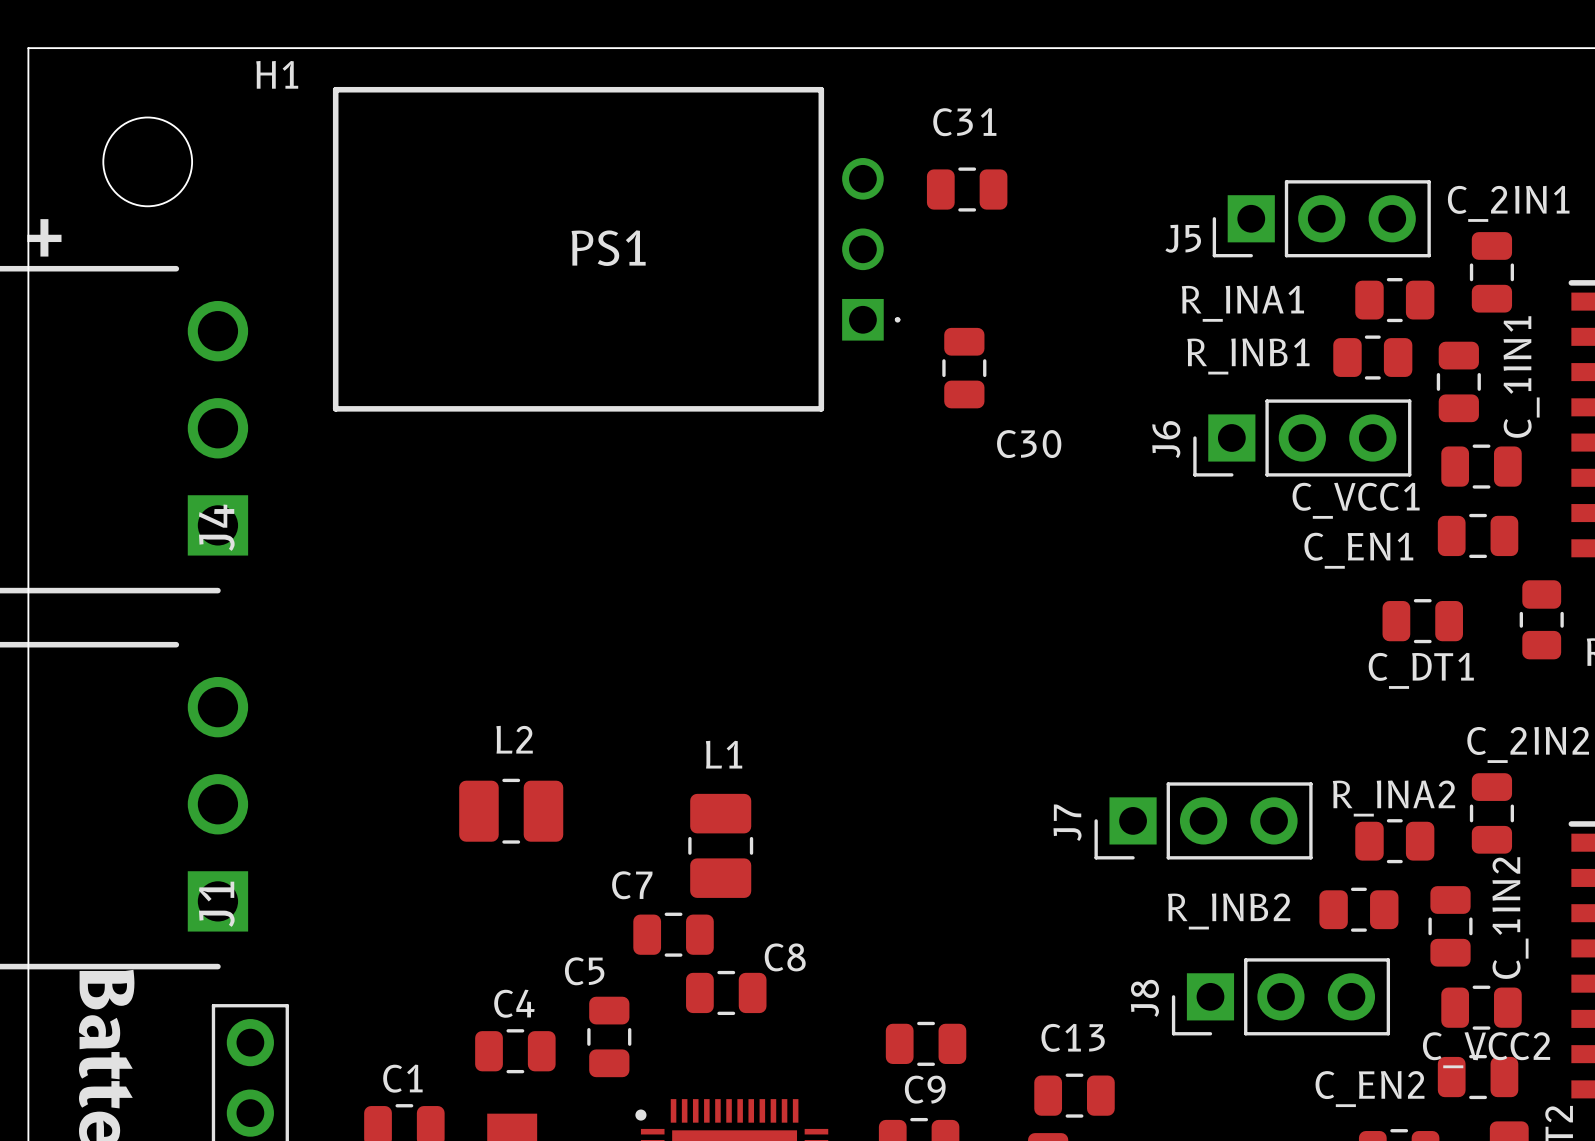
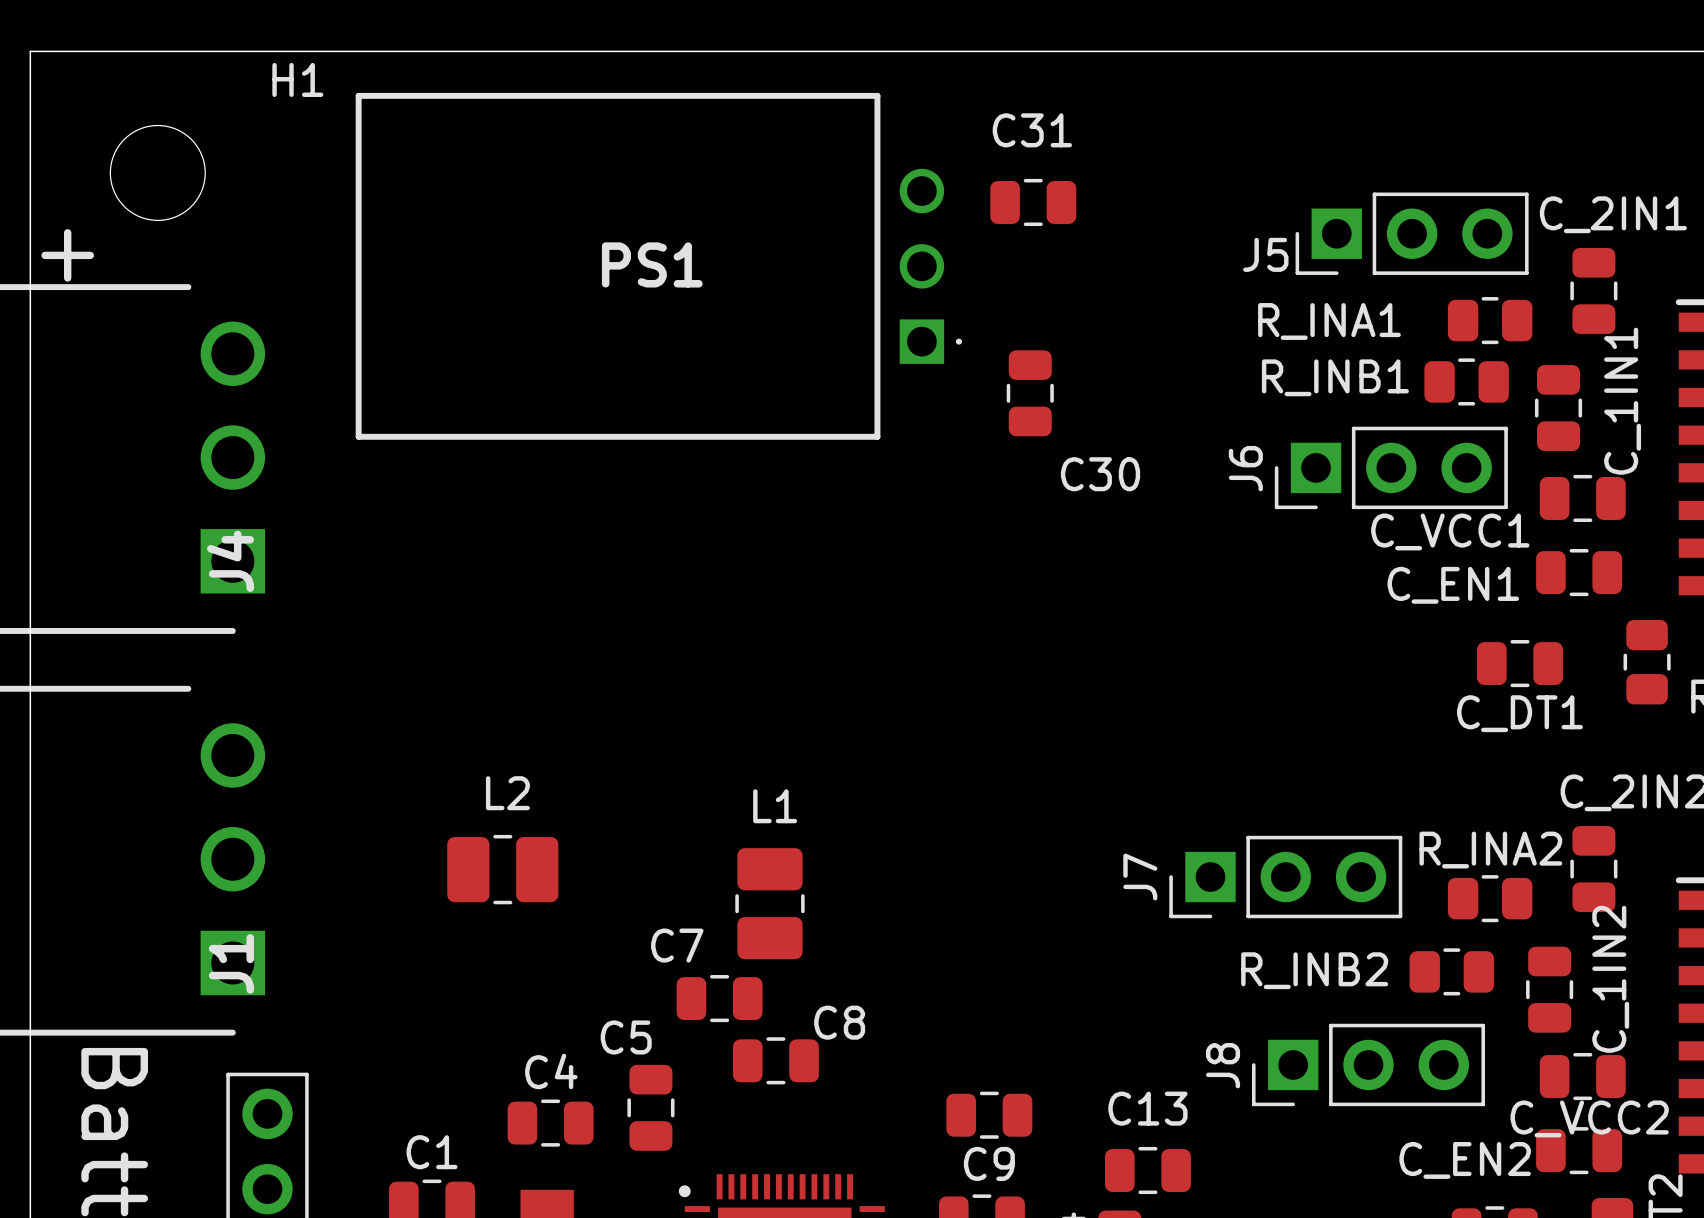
L2 position: (511, 811) -> (502, 869)

